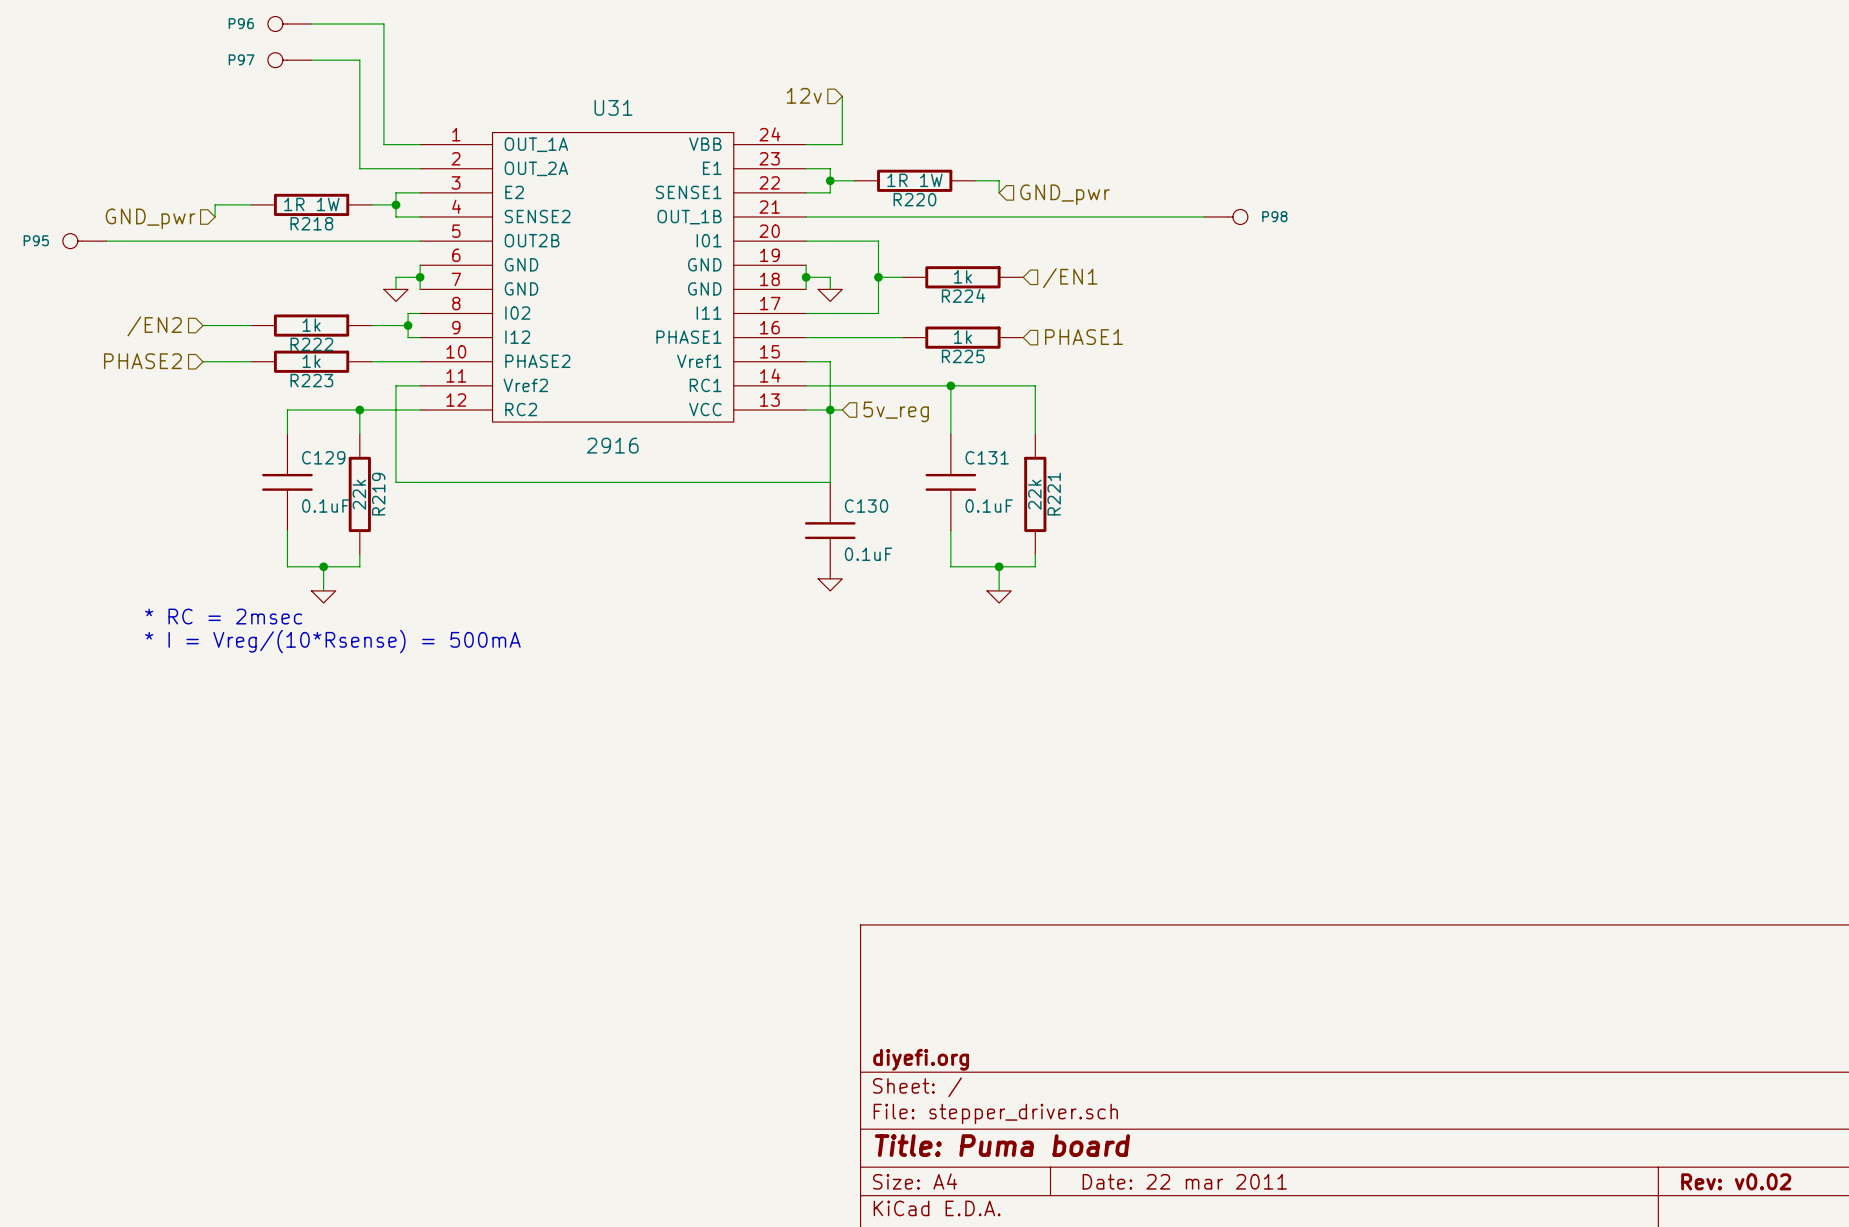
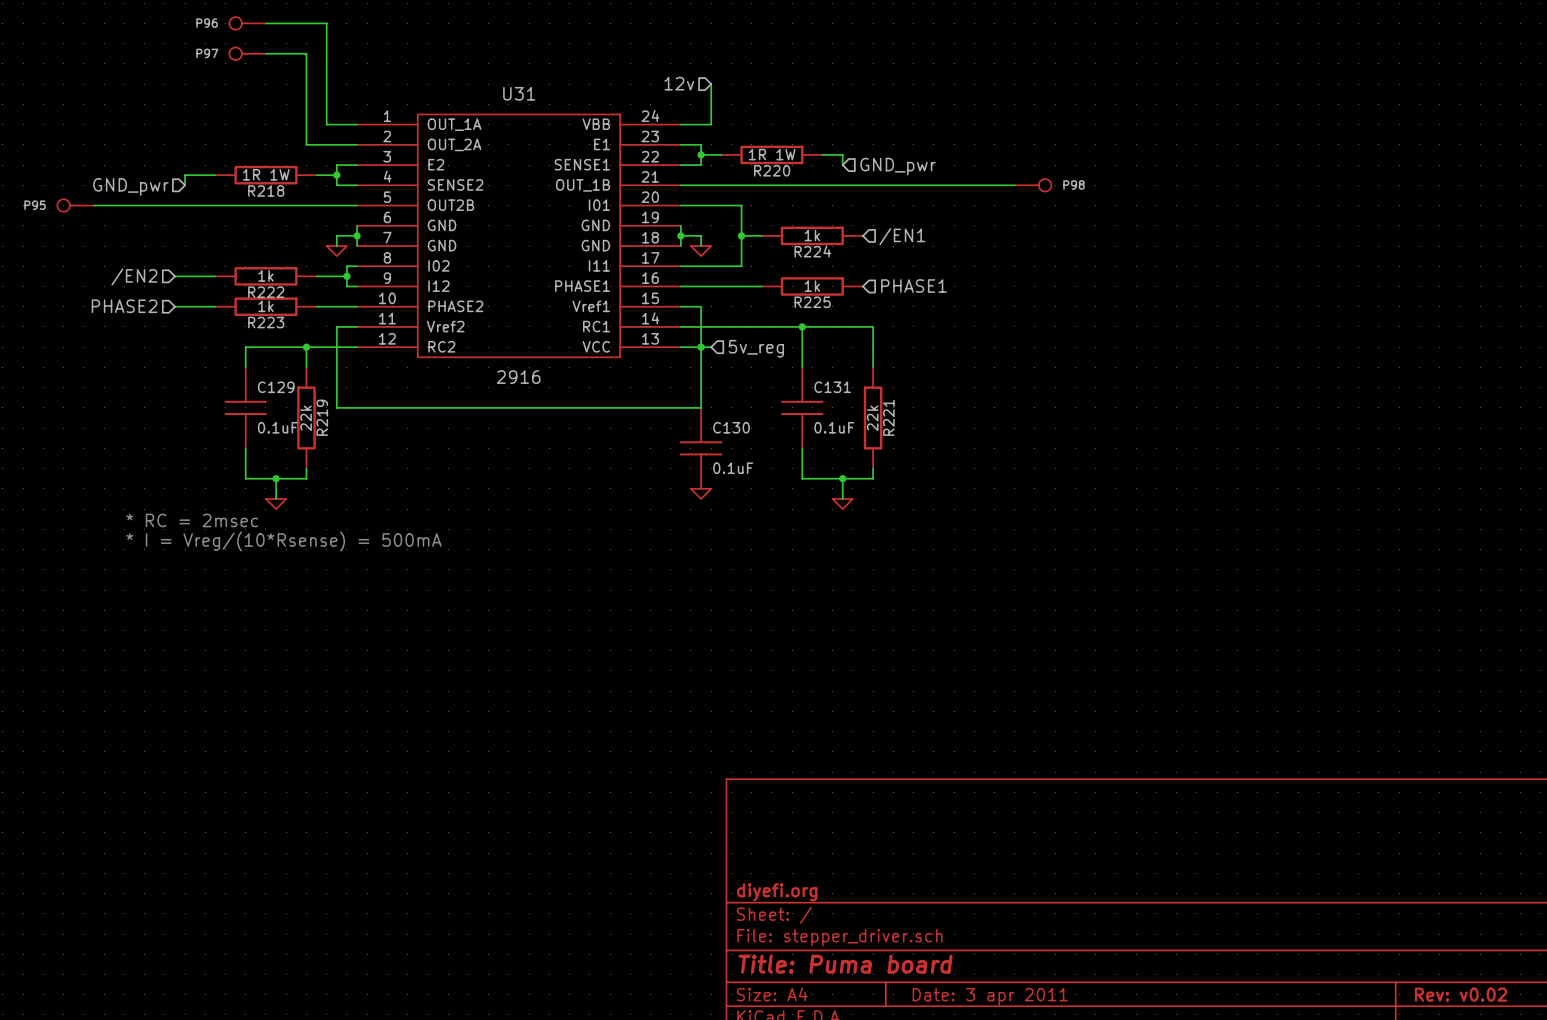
title block: Date: 22 mar 2011 (1184, 1181) -> Date: 3 apr 2011 (990, 996)

